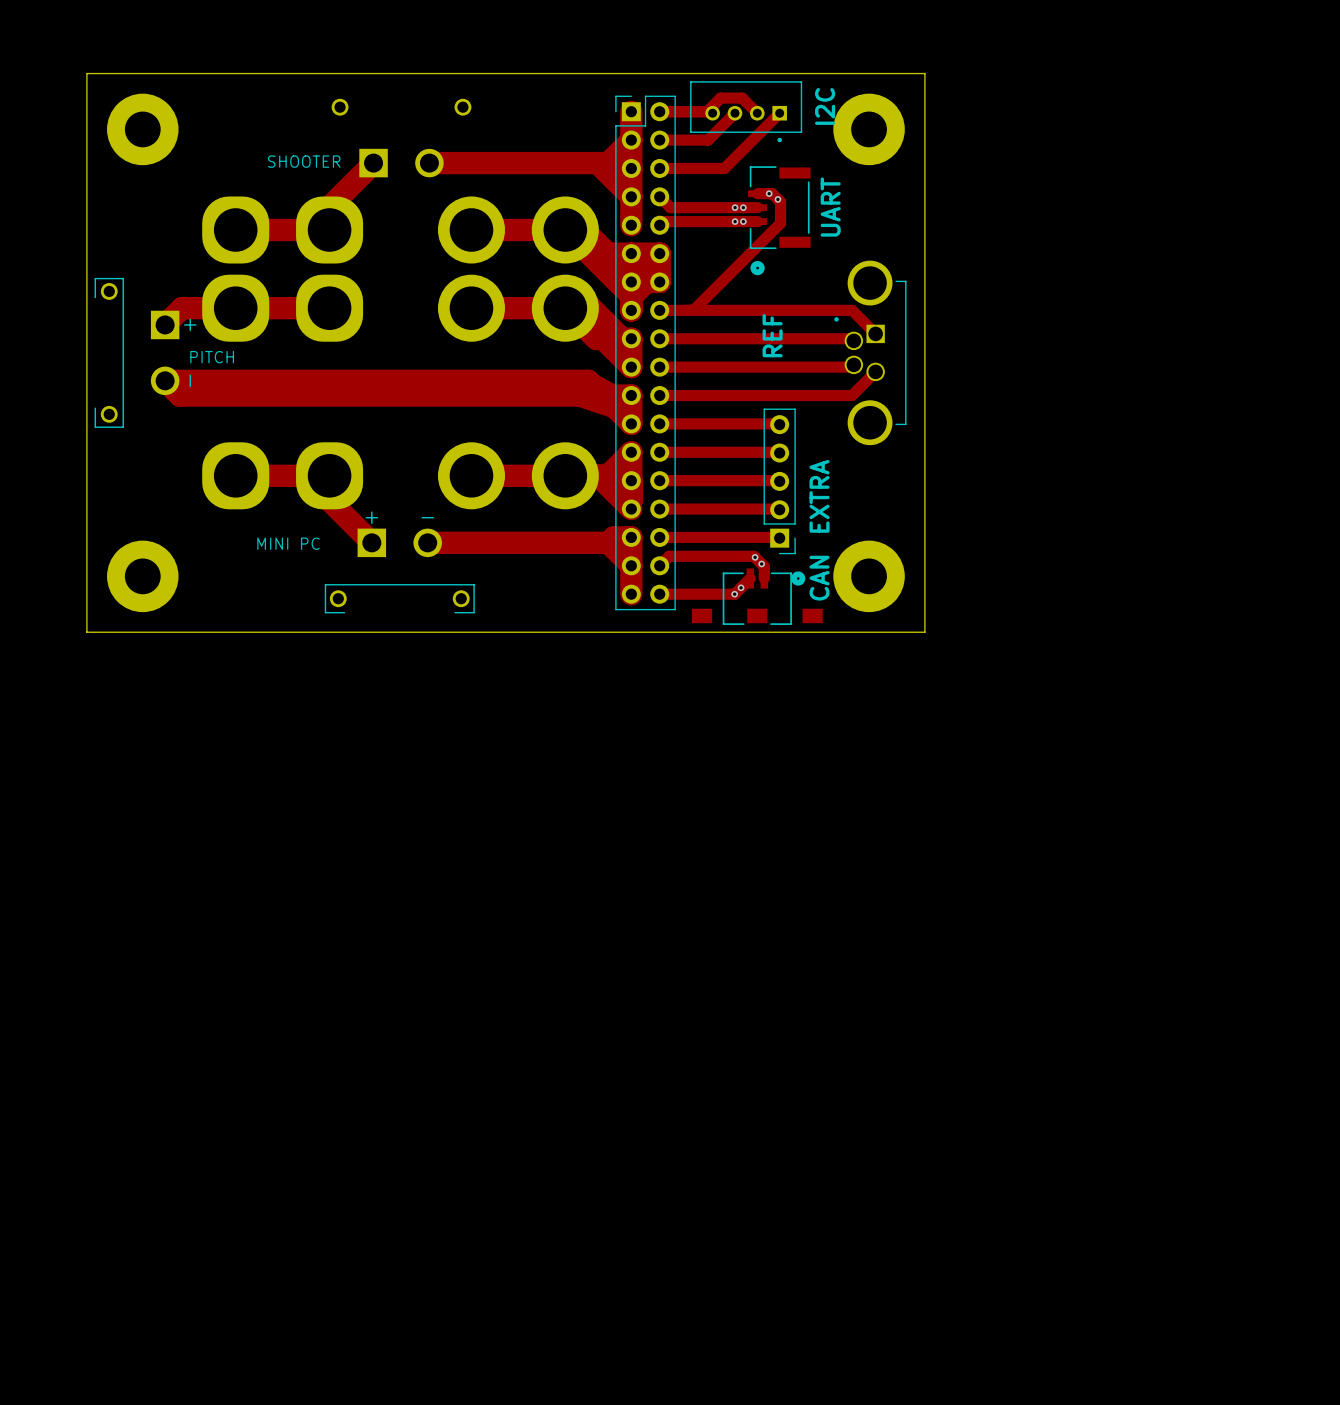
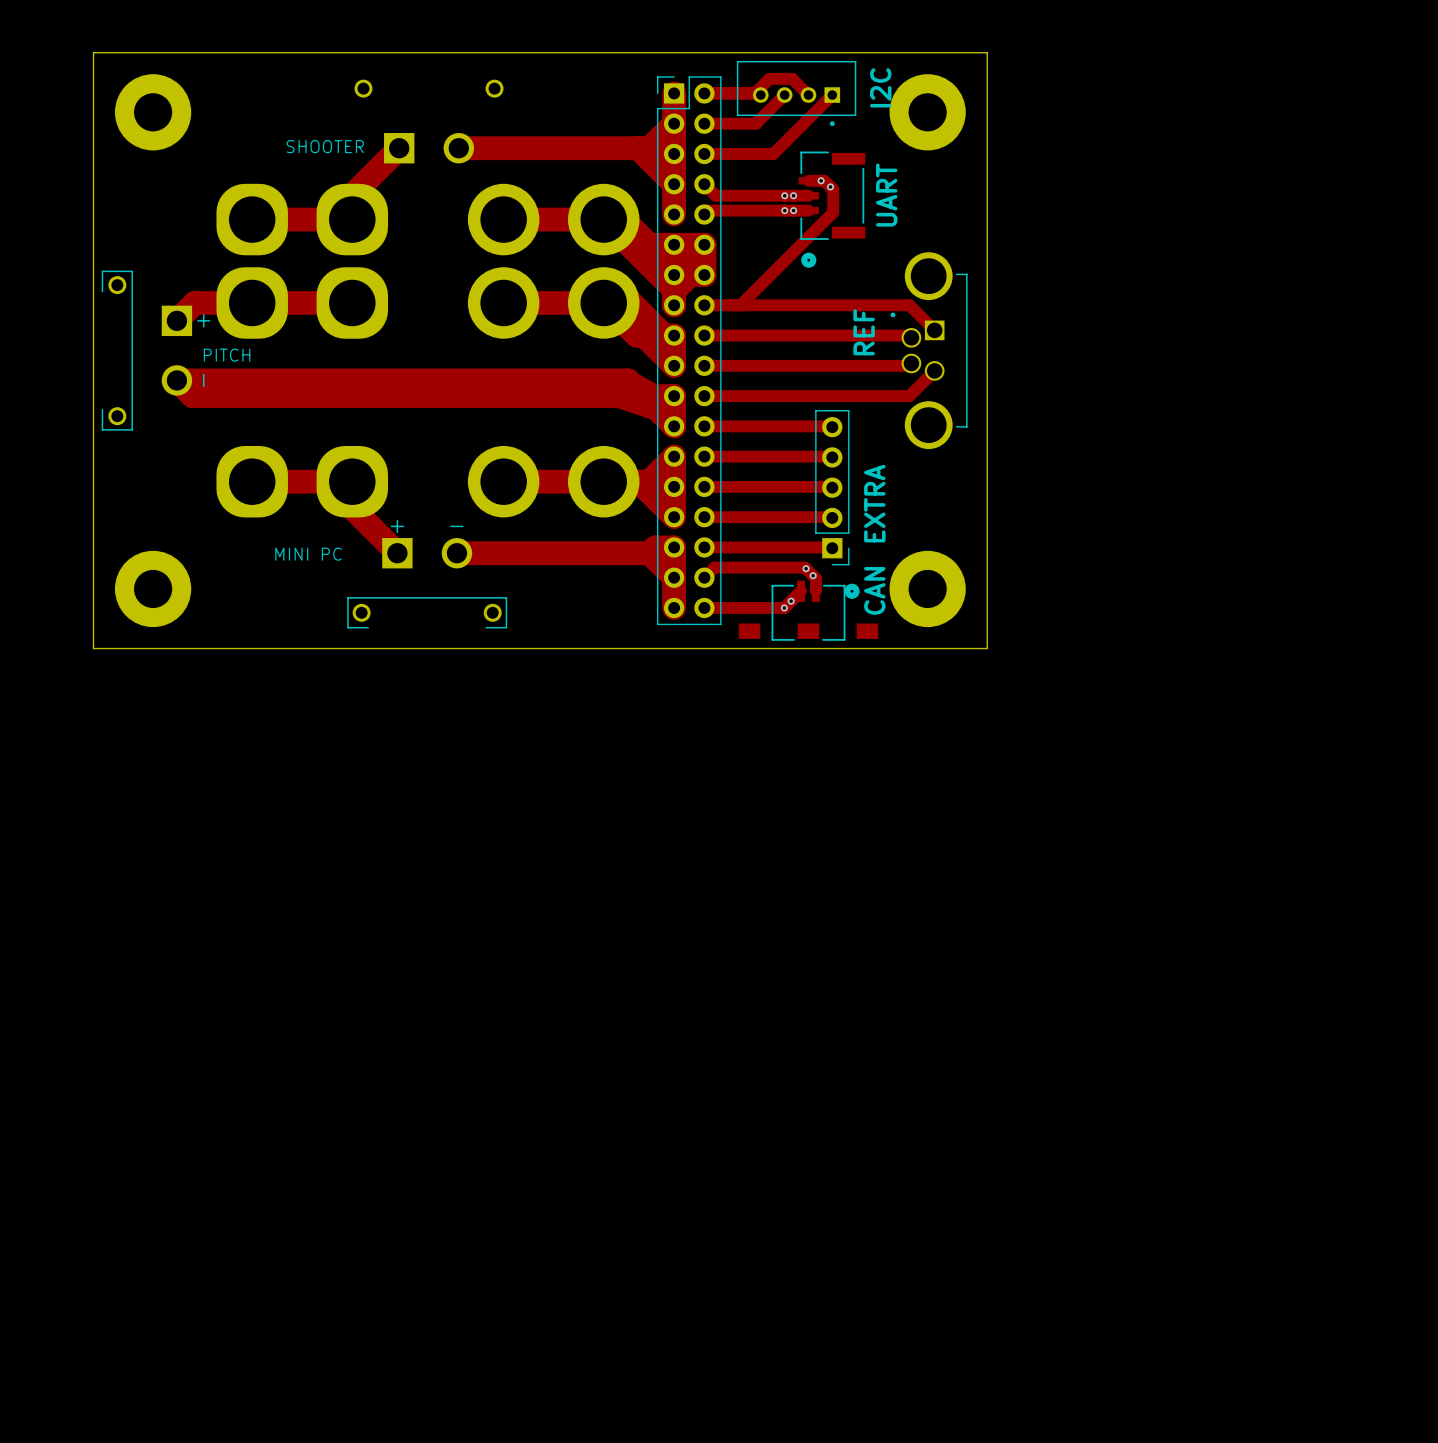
text position: REF (772, 335) -> REF (864, 332)

